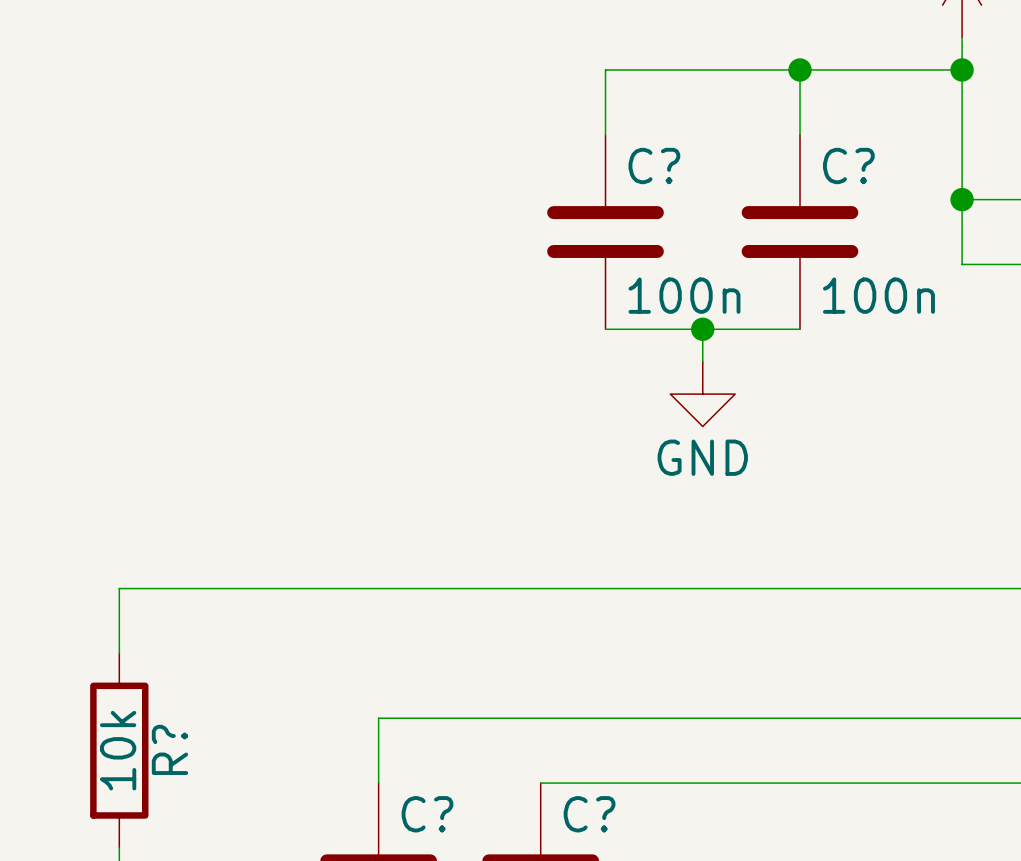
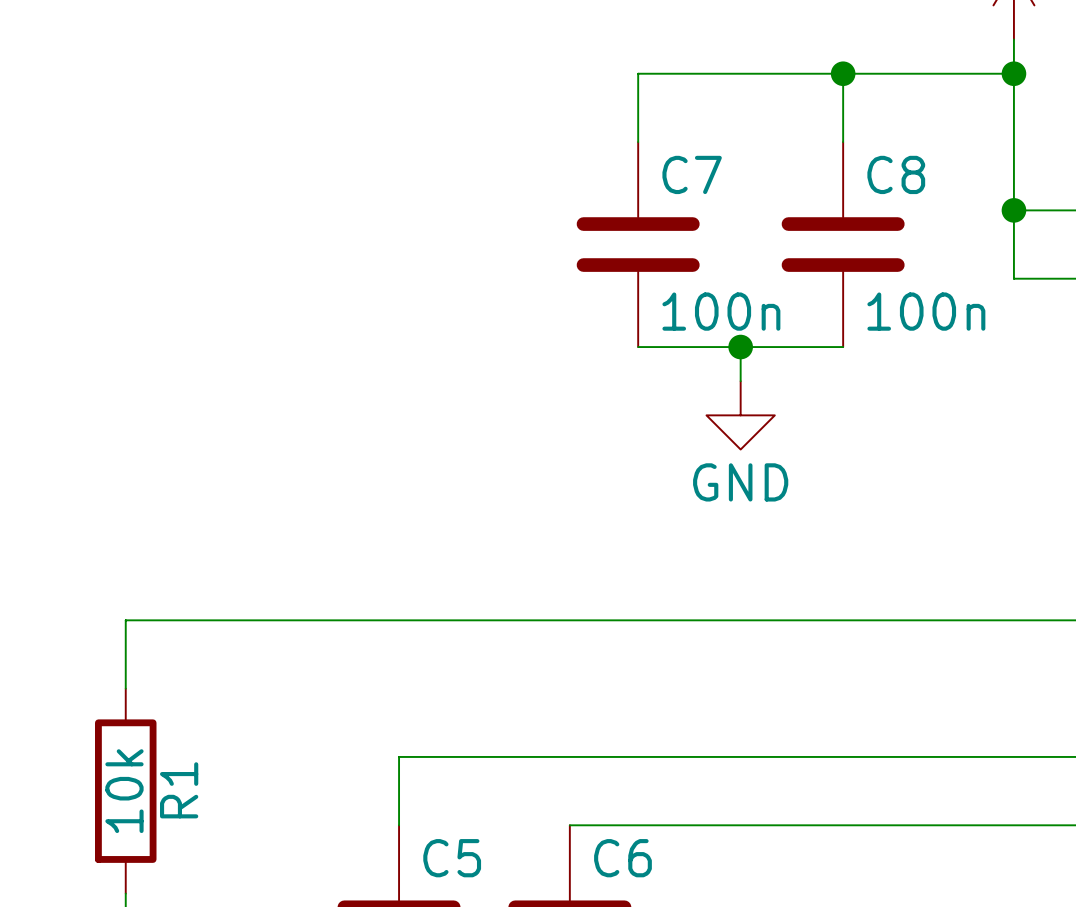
C? name: C? (654, 165) -> C7 (692, 174)
C? name: C? (848, 165) -> C8 (896, 174)
R? name: R? (169, 749) -> R1 (179, 790)
C? name: C? (427, 814) -> C5 (452, 858)
C? name: C? (589, 814) -> C6 (622, 858)

